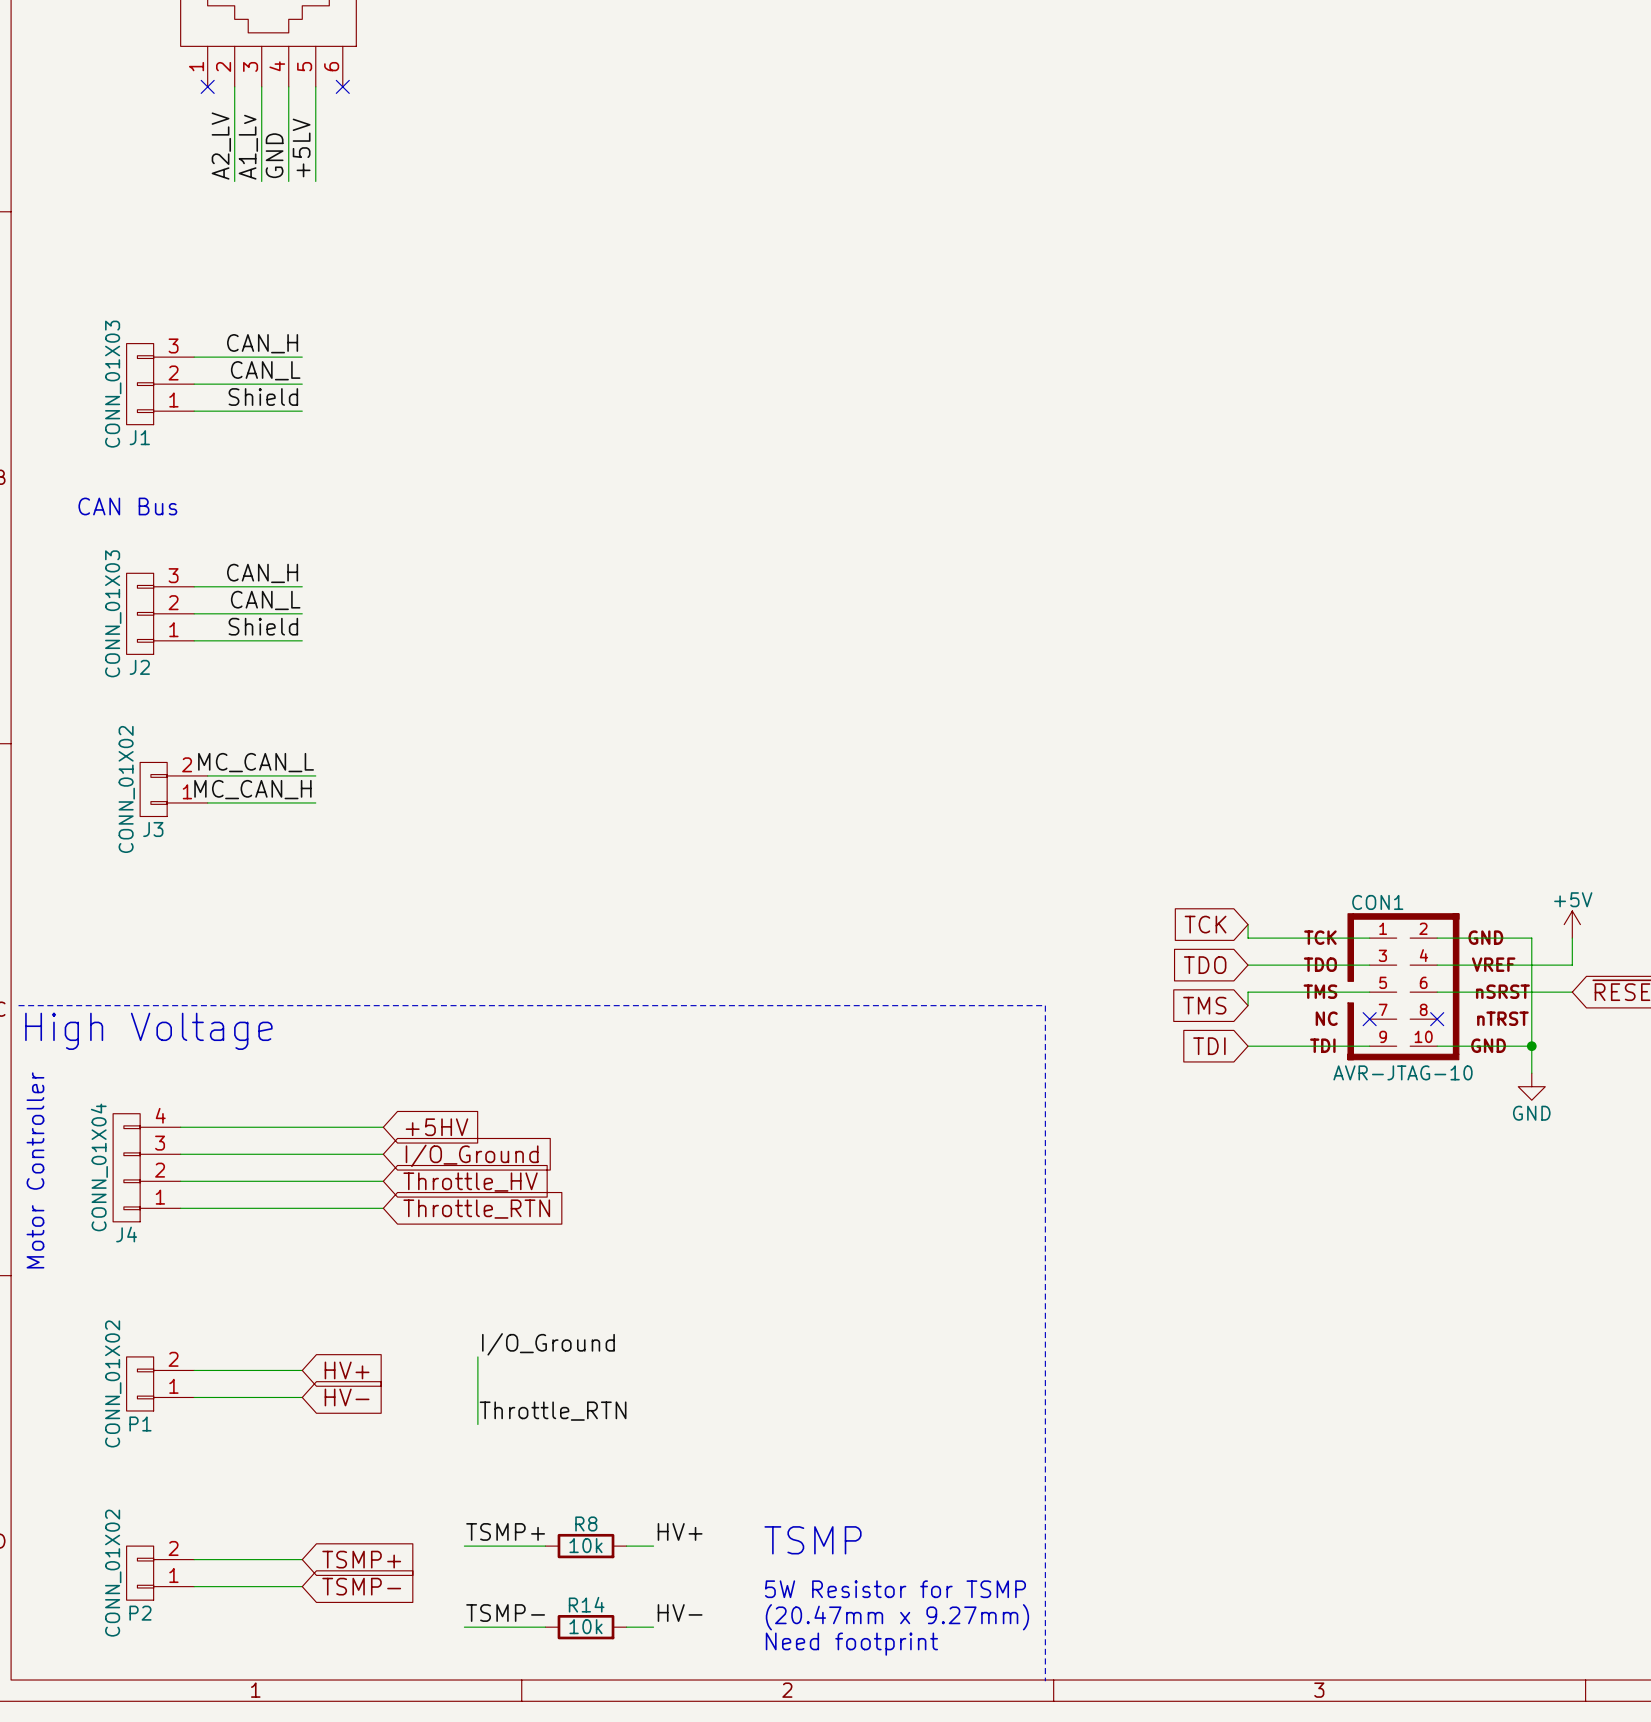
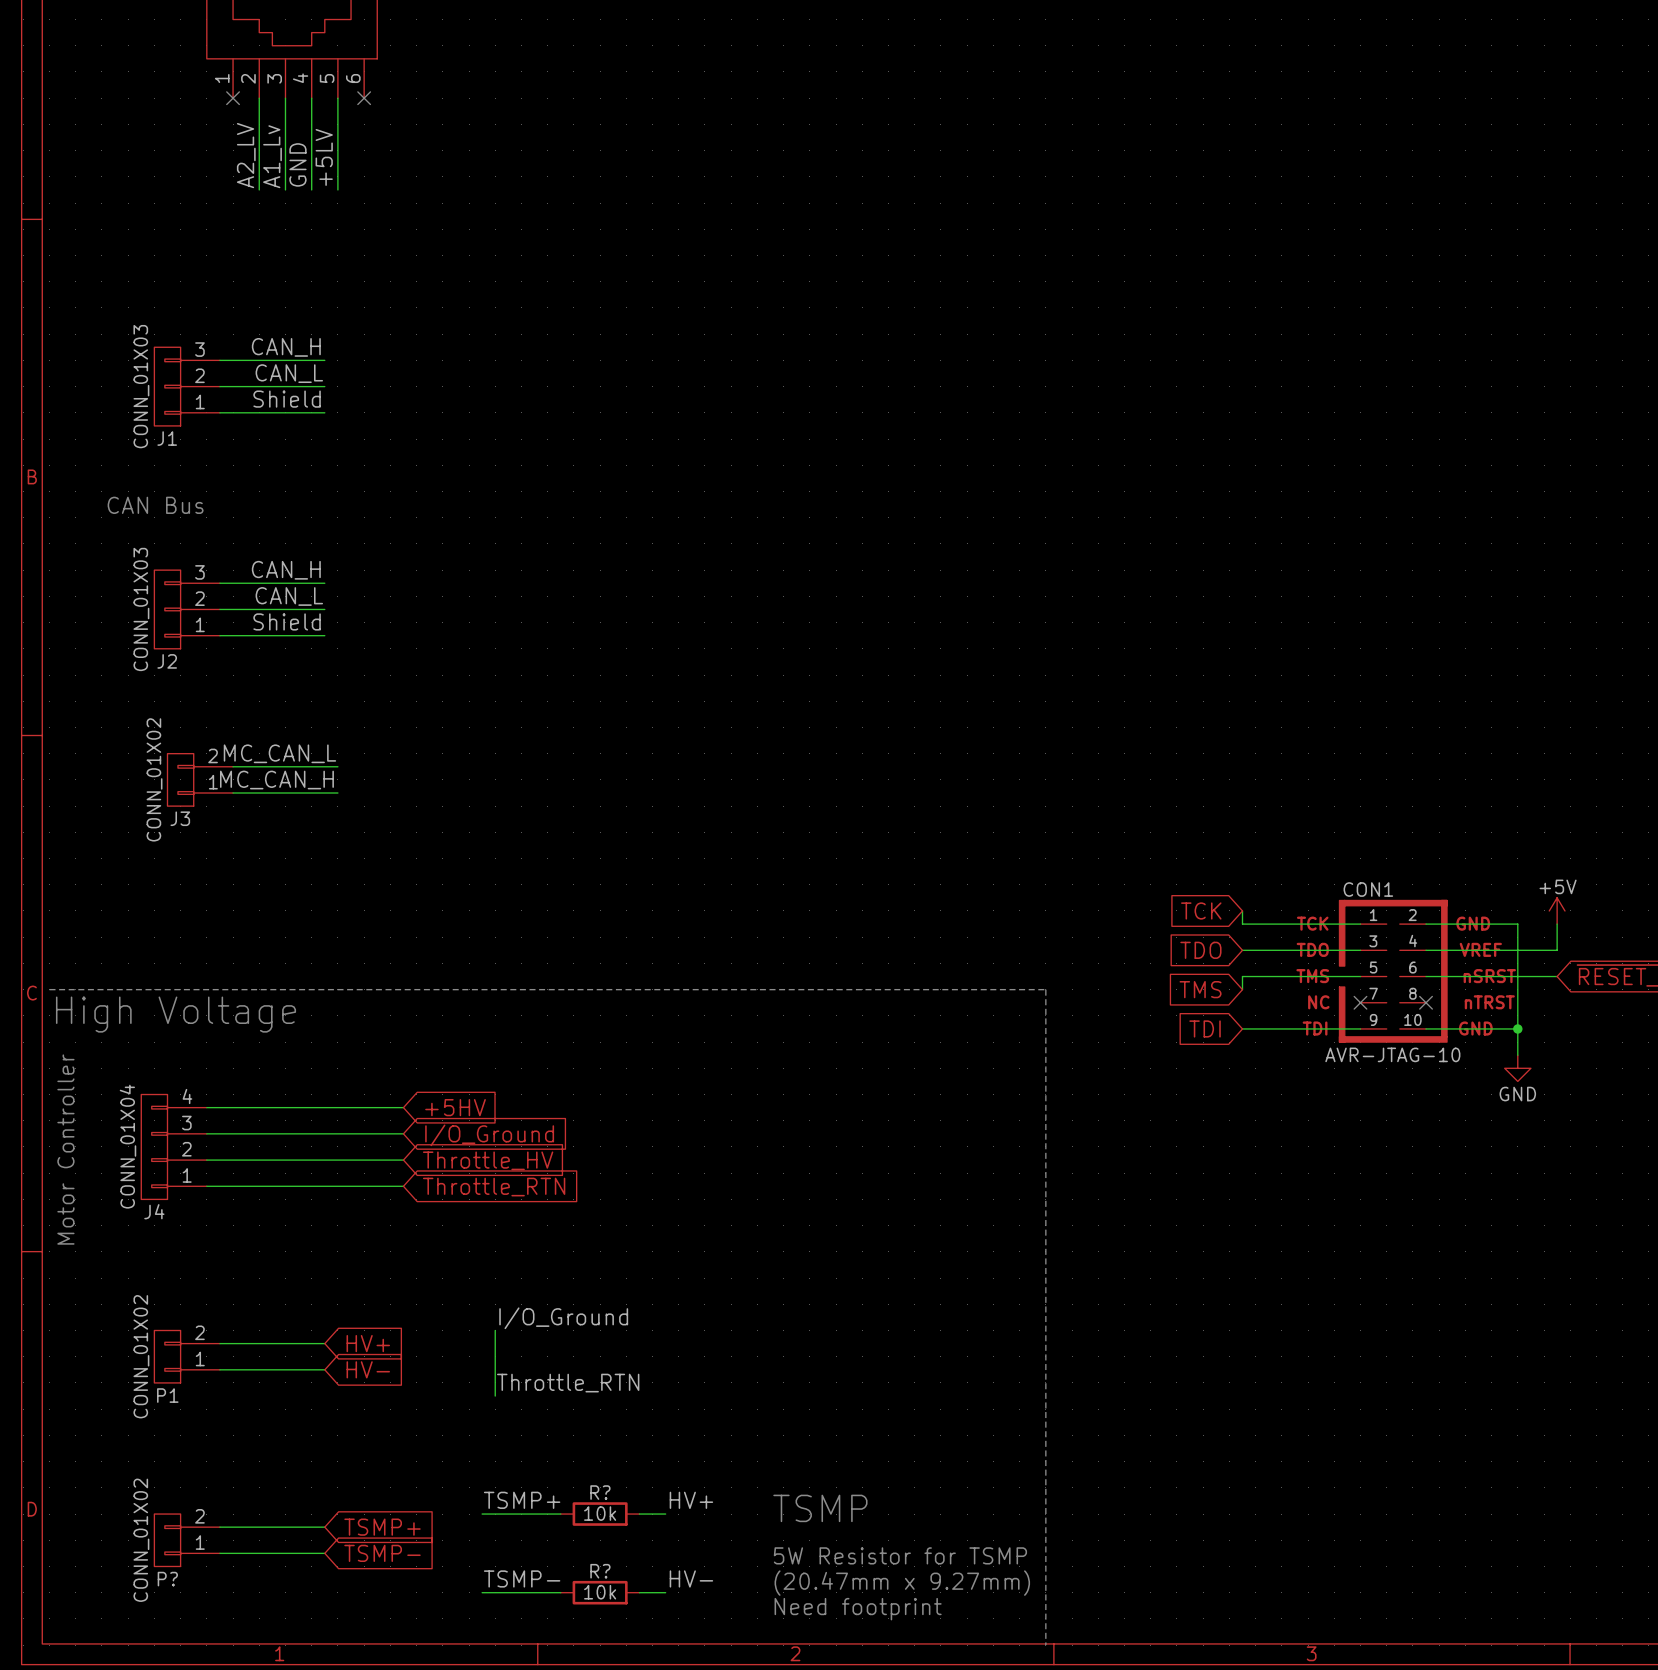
R8 name: R8 (586, 1523) -> R? (600, 1492)
R14 name: R14 (586, 1604) -> R? (600, 1571)
P2 name: P2 (140, 1613) -> P? (167, 1579)

